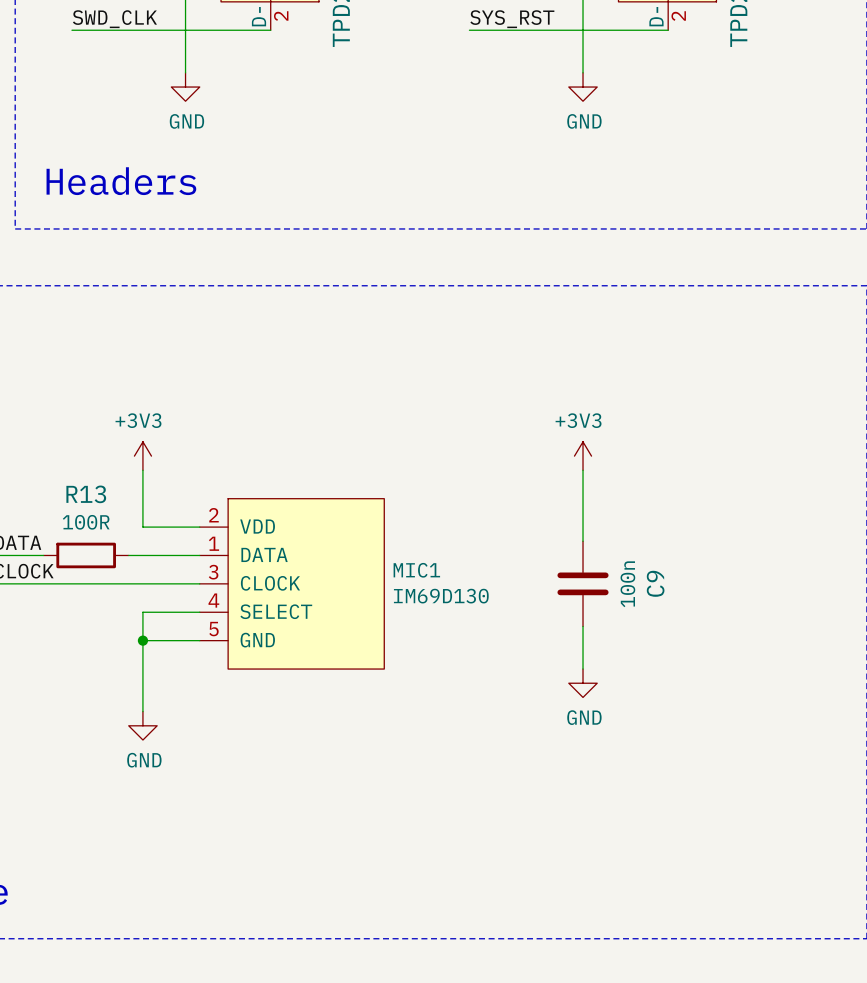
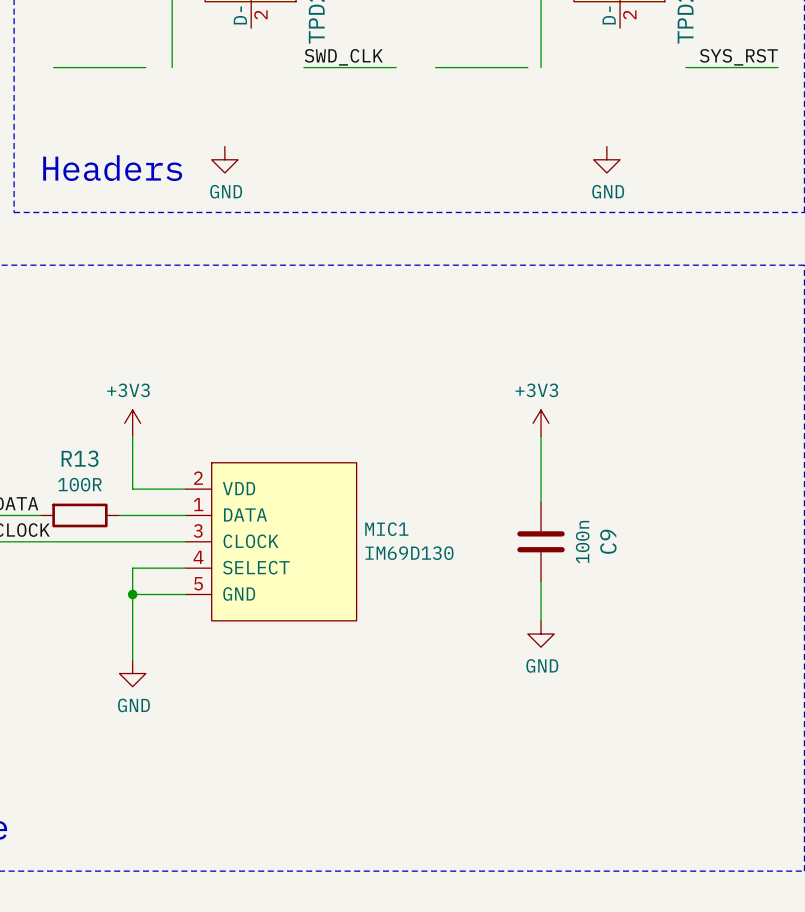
label position: SWD_CLK (114, 19) -> SWD_CLK (343, 57)
label: SYS_RST (512, 19) -> none
wire: (71, 30) (270, 30) -> none
wire: (469, 30) (668, 30) -> none
label: none -> SYS_RST (738, 57)
wire: none -> (53, 67) (145, 67)
wire: none -> (303, 67) (396, 67)
wire: none -> (435, 67) (527, 67)
wire: none -> (685, 67) (778, 67)
power symbol position: GND (185, 87) -> GND (224, 159)
power symbol: GND (583, 87) -> none
power symbol: none -> GND (606, 159)

